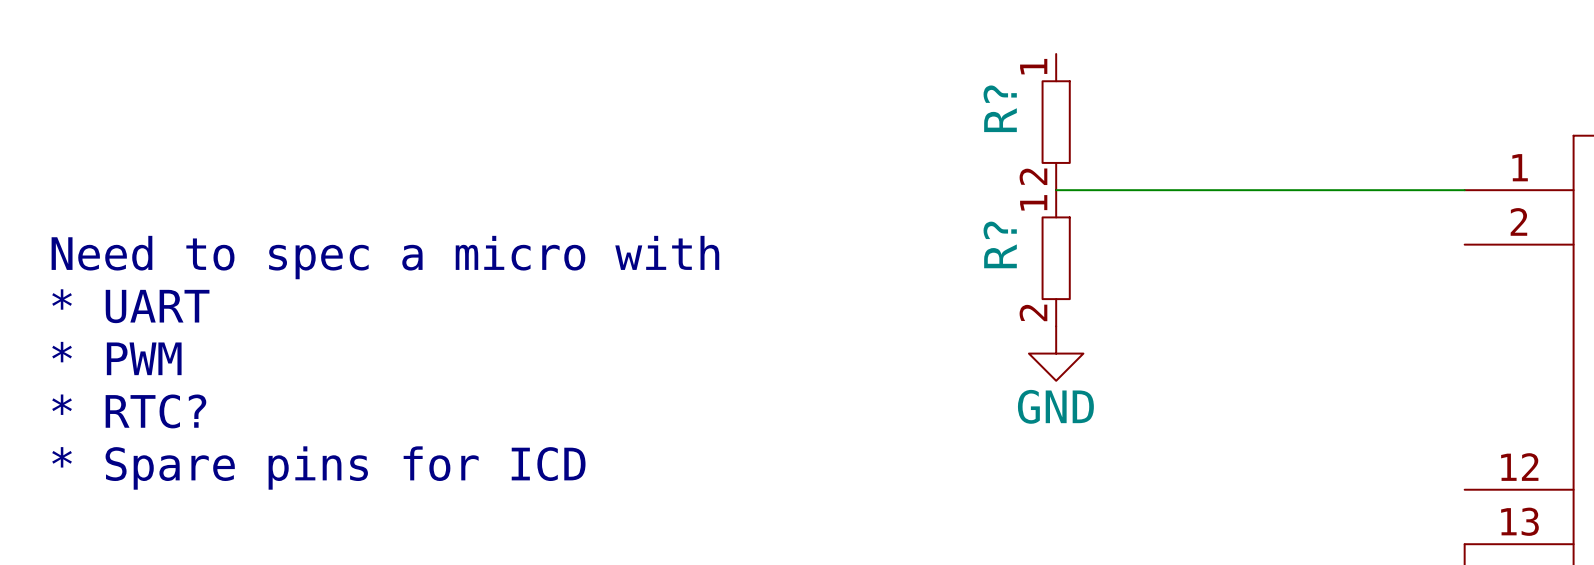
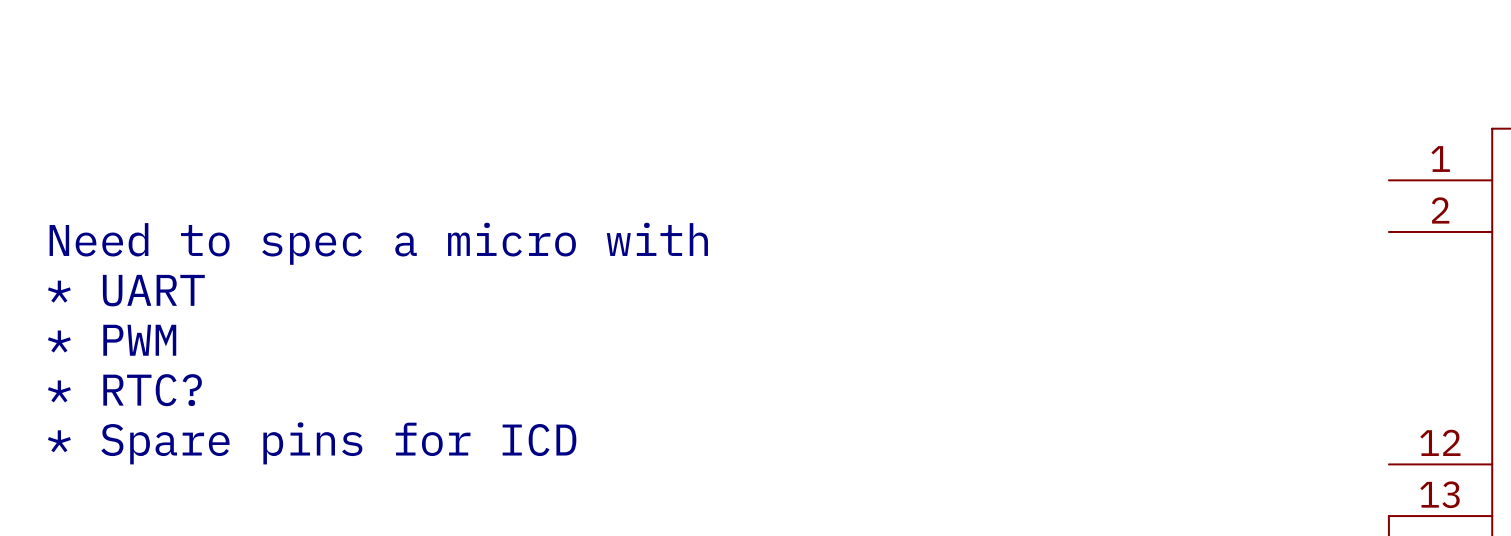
R?: (1056, 122) -> none
wire: (1056, 190) (1464, 190) -> none
R?: (1056, 258) -> none
power symbol: GND (1056, 353) -> none

